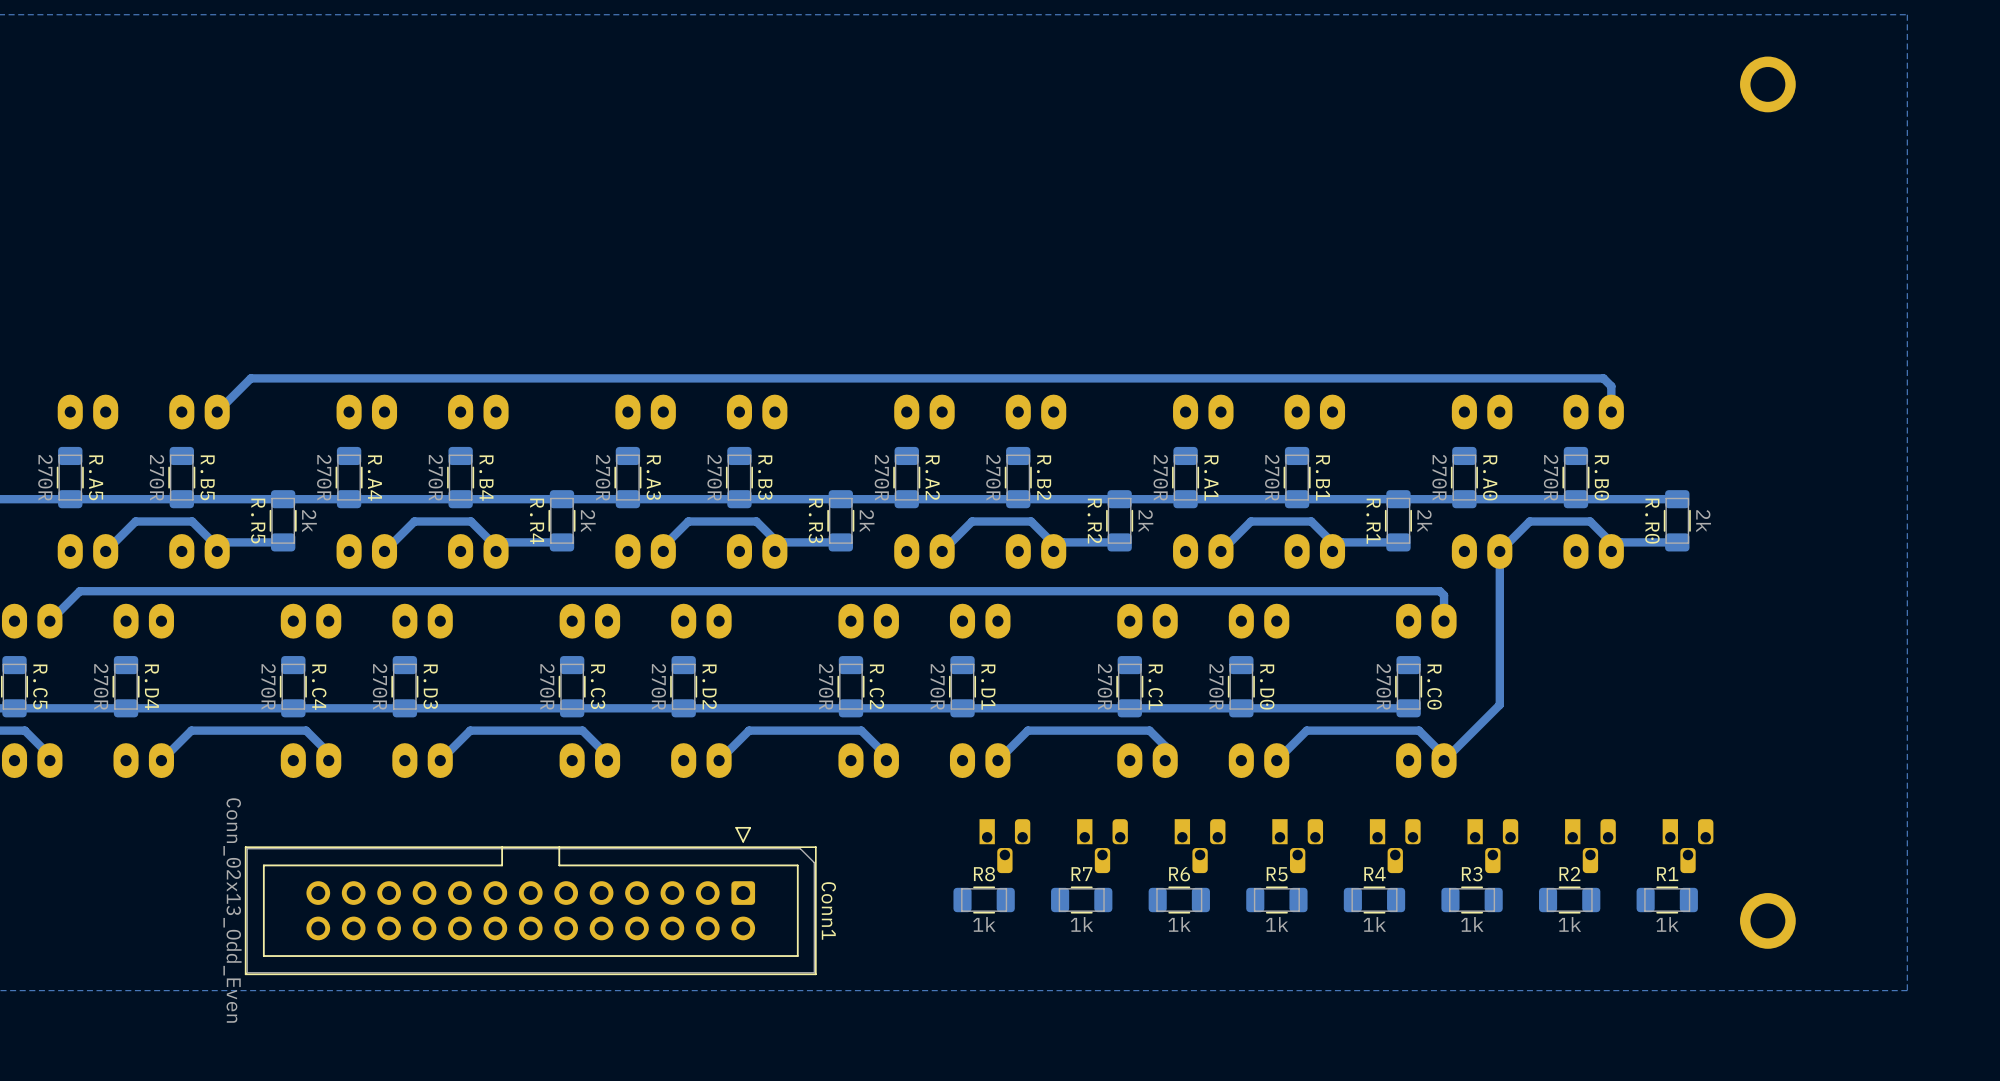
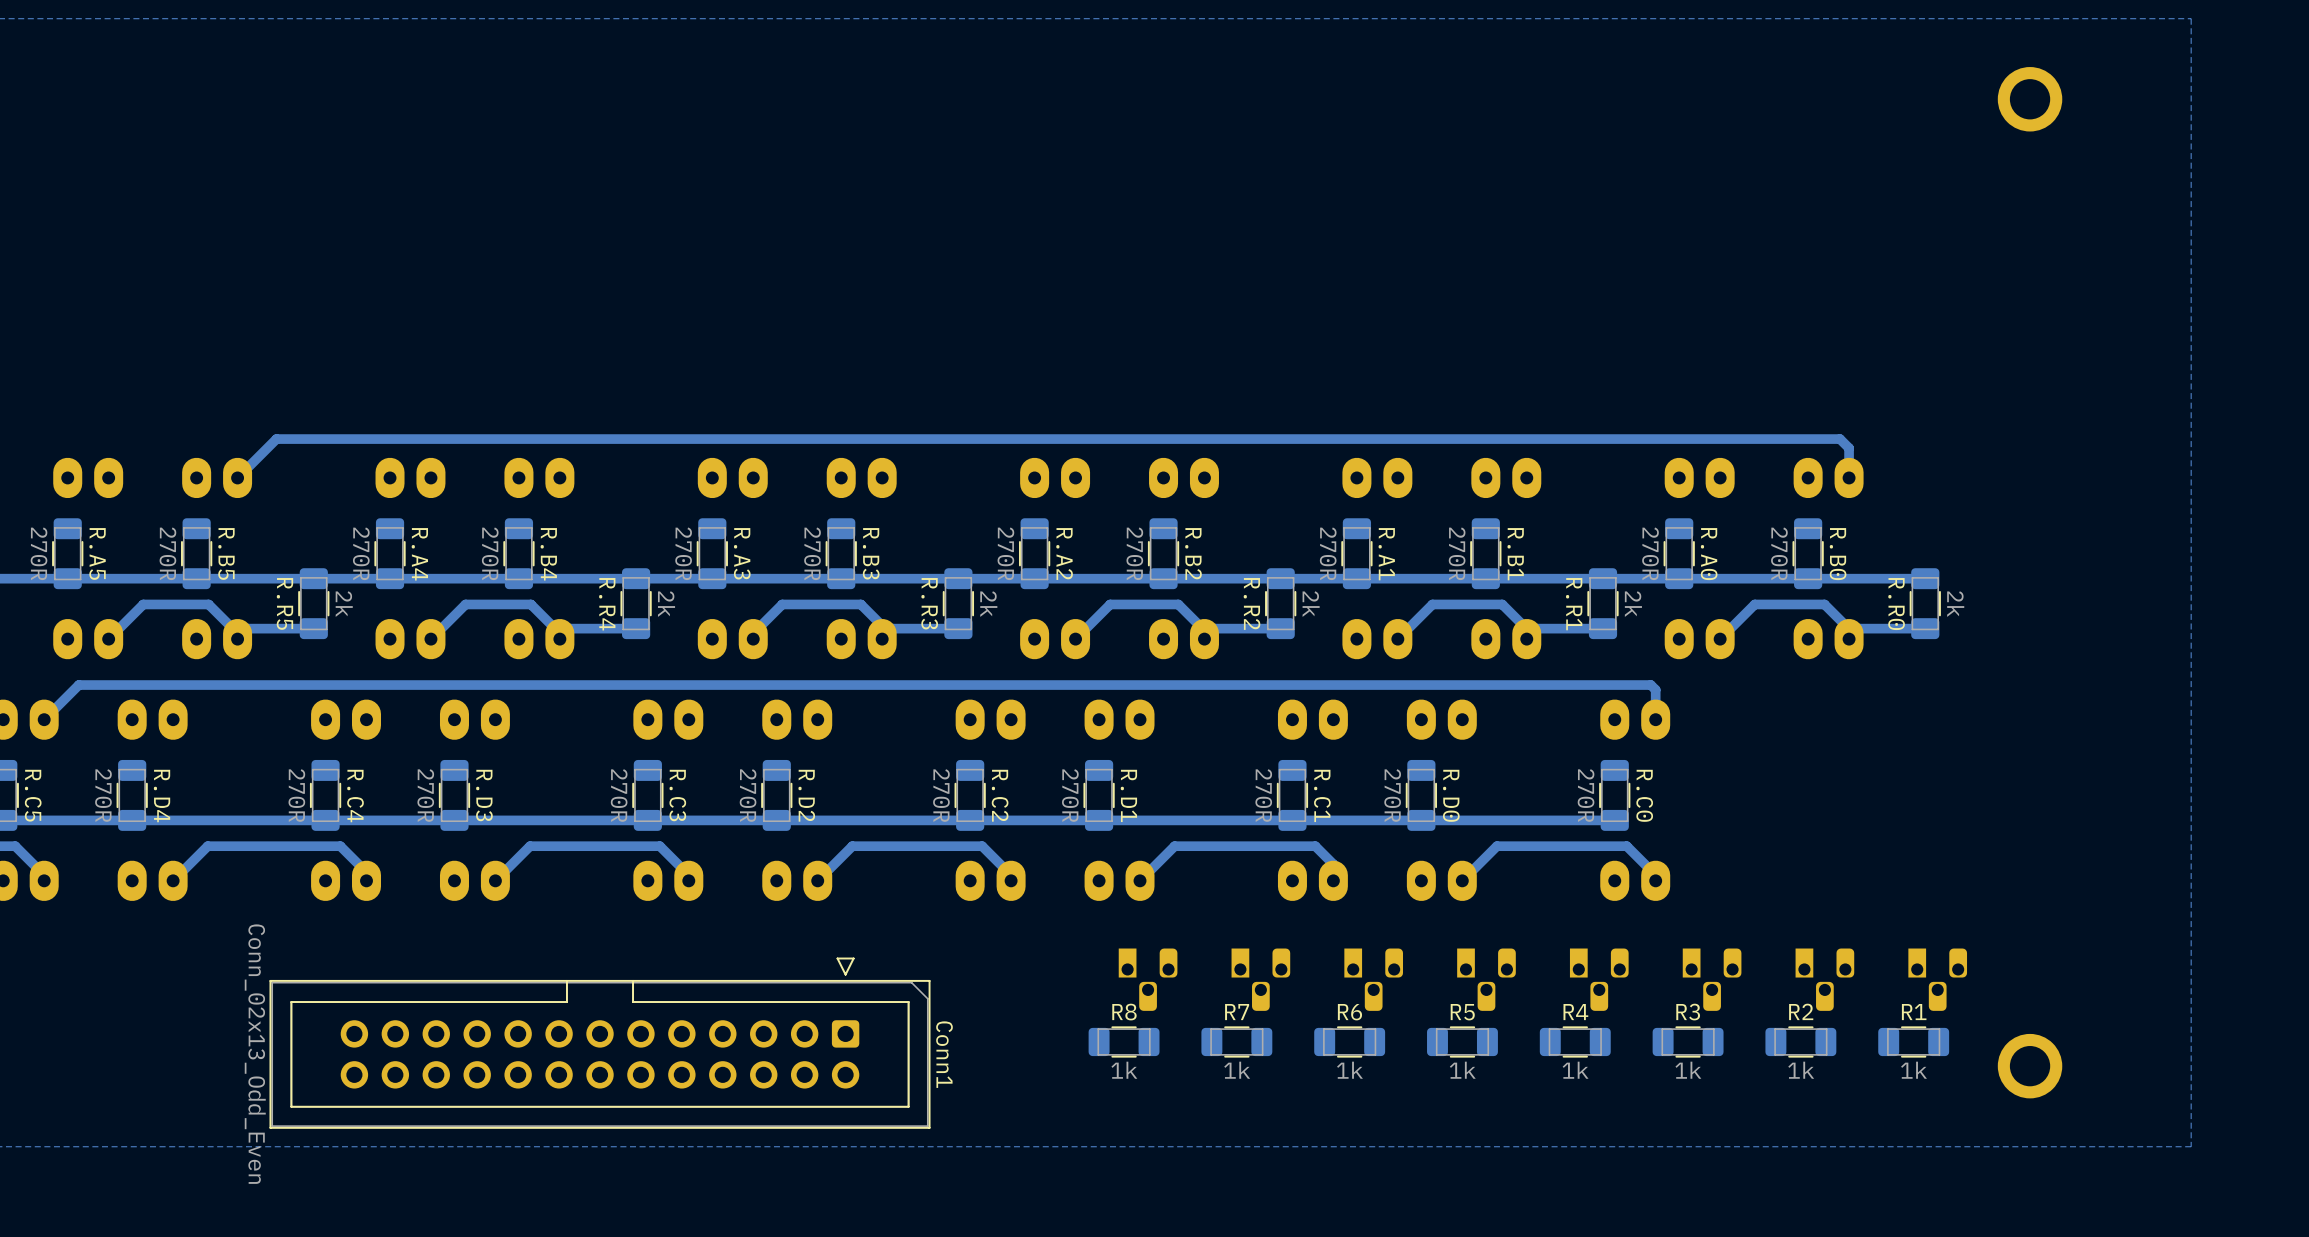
track: (1499, 551) (1499, 704) (1444, 760) -> none

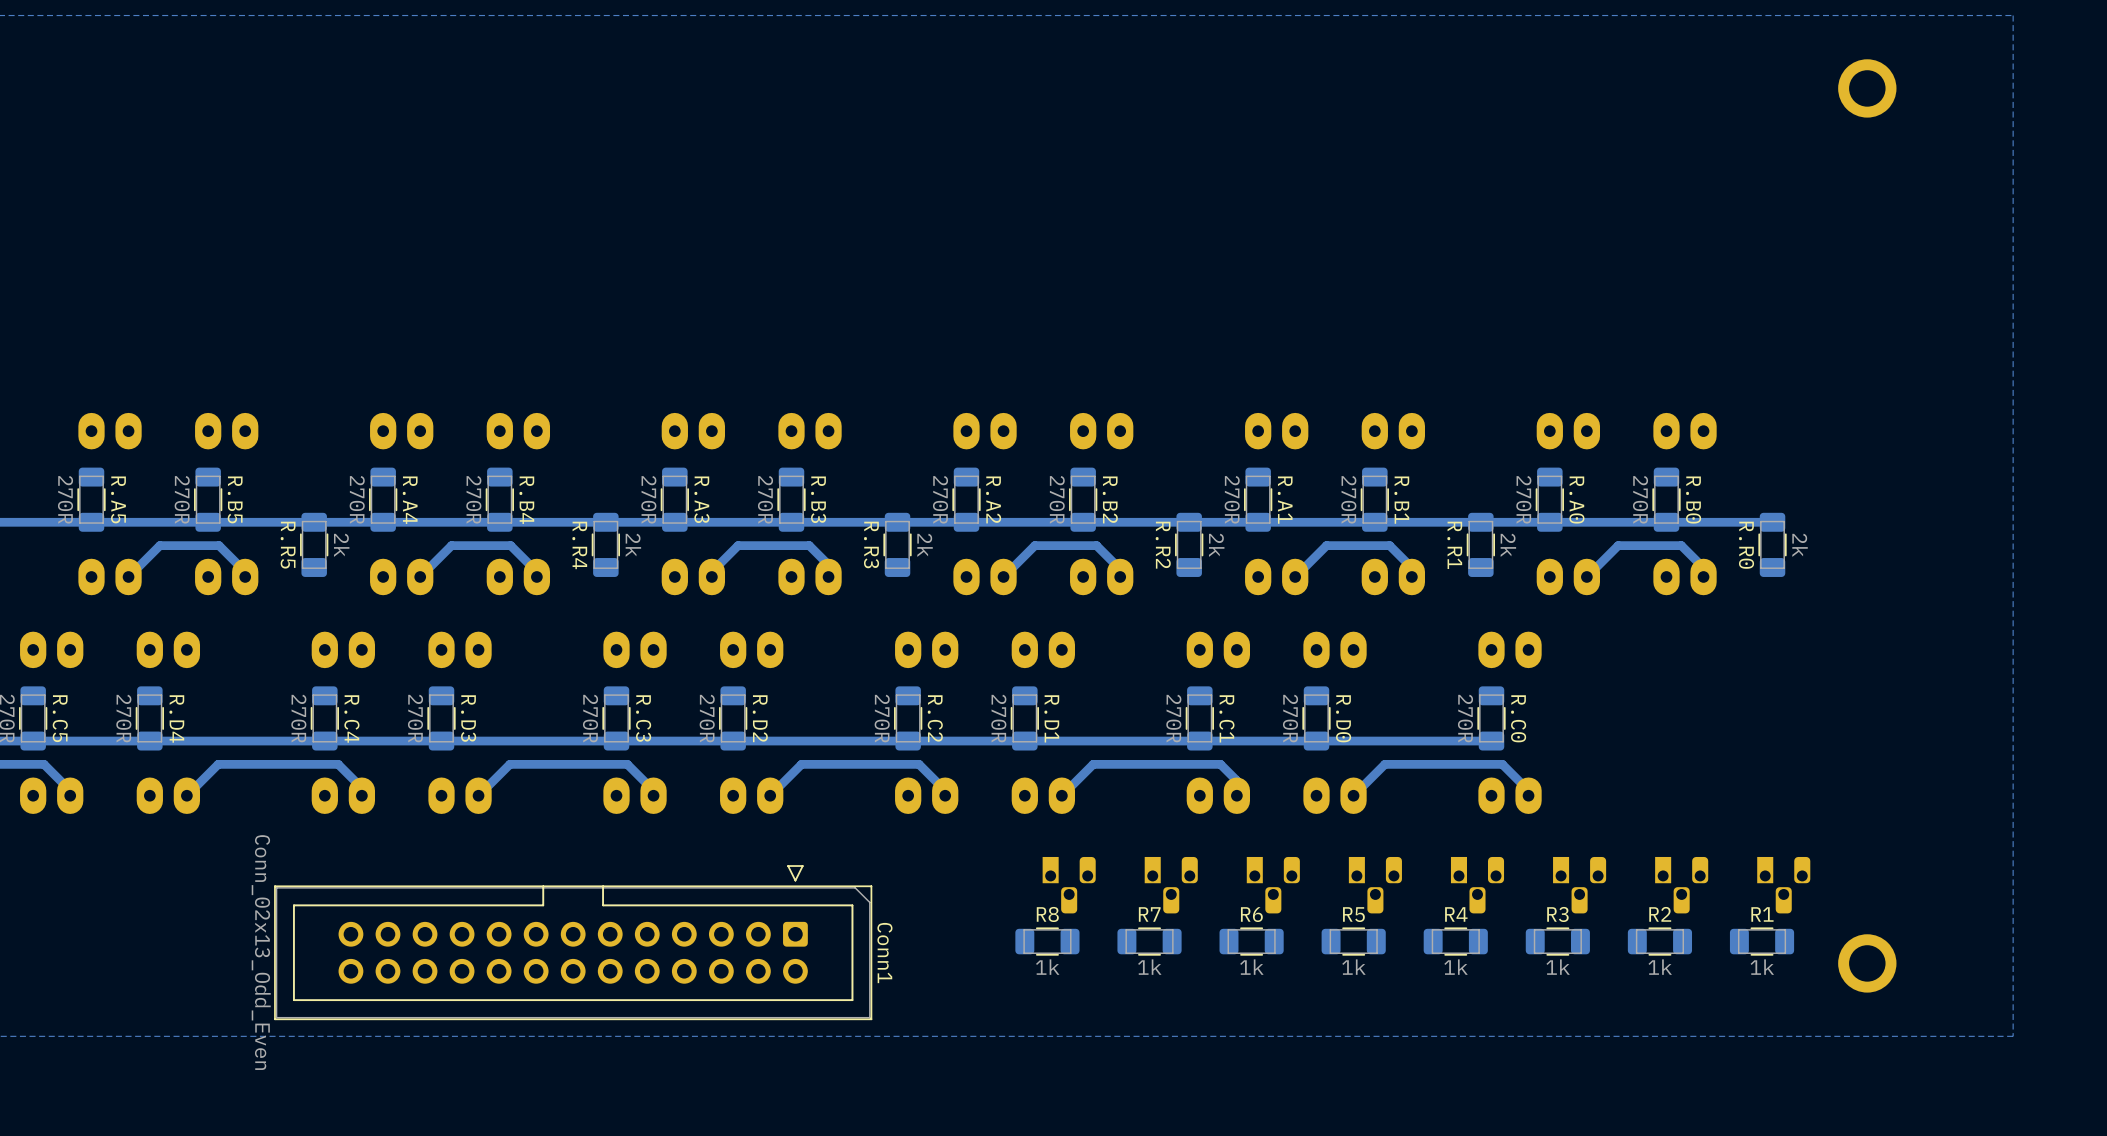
track: (1849, 477) (1849, 448) (1839, 439) (276, 439) (237, 477) -> none
track: (313, 628) (248, 628) (237, 639) -> none
track: (636, 628) (570, 628) (559, 639) -> none
track: (958, 628) (892, 628) (882, 639) -> none
track: (1280, 628) (1214, 628) (1204, 639) -> none
track: (1602, 628) (1537, 628) (1526, 639) -> none
track: (1925, 628) (1859, 628) (1849, 639) -> none
track: (1655, 719) (1655, 689) (1650, 685) (78, 685) (44, 719) -> none

